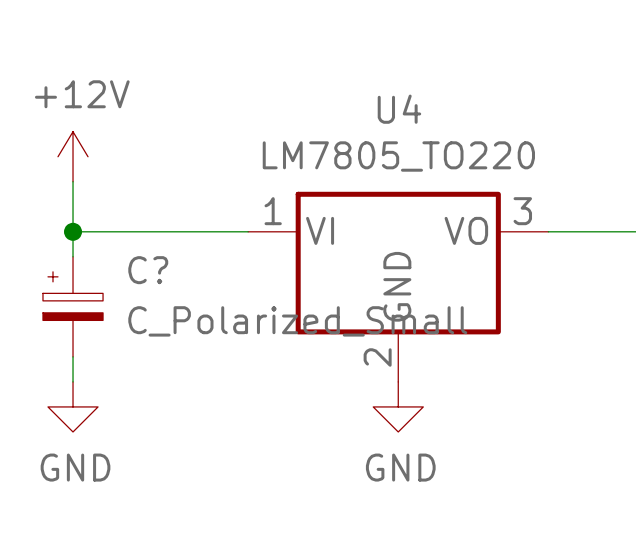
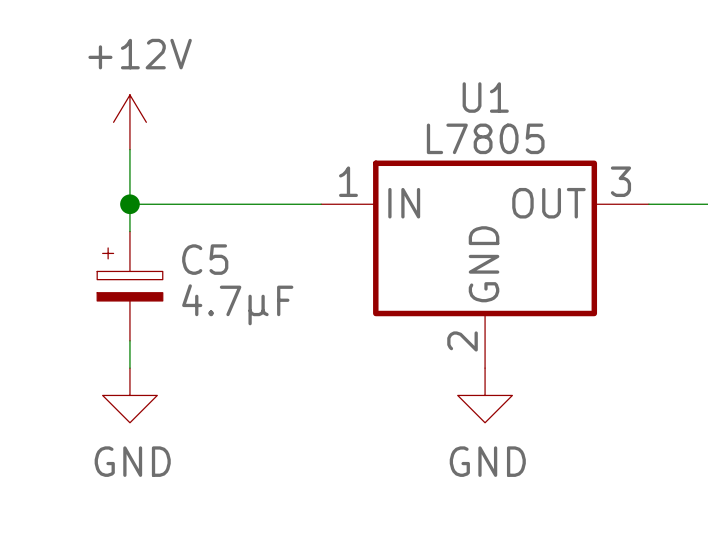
U4 name: U4 (399, 109) -> U1 (485, 97)
U4 value: LM7805_TO220 (398, 156) -> L7805 (485, 138)
U4 pin name: VI (320, 230) -> IN (404, 203)
U4 pin name: VO (466, 230) -> OUT (548, 203)
C? name: C? (148, 270) -> C5 (205, 259)
C? value: C_Polarized_Small (297, 321) -> 4.7µF (237, 304)

